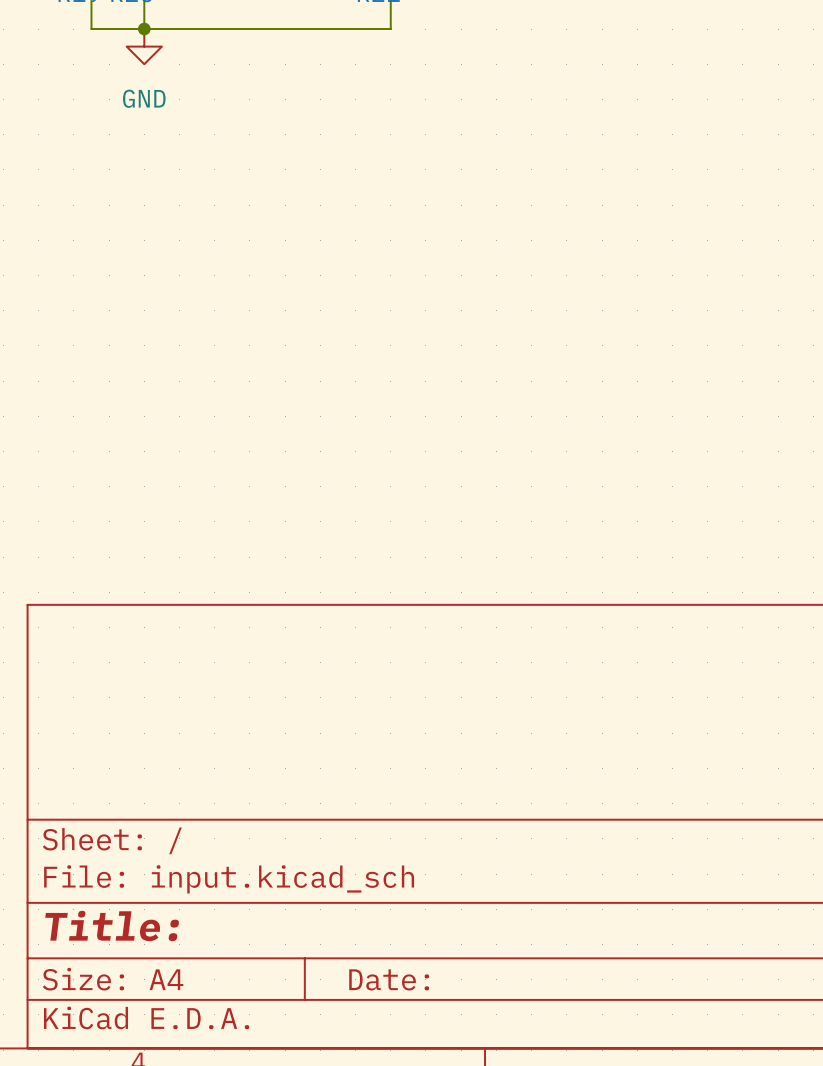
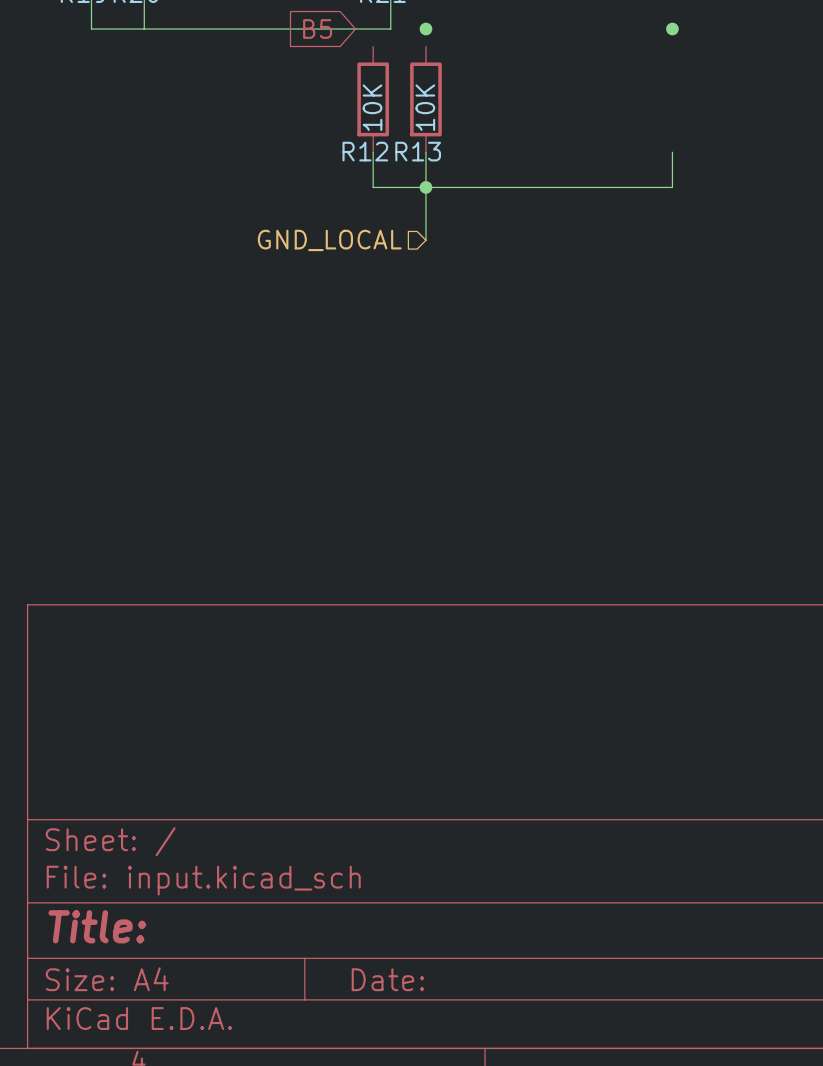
junction: (144, 29) -> none
global label: none -> B5 (317, 29)
junction: none -> (425, 29)
junction: none -> (672, 29)
power symbol: GND (144, 46) -> none
R12: none -> 10K (373, 99)
R13: none -> 10K (425, 99)
wire: none -> (373, 152) (373, 187) (672, 187) (672, 152)
wire: none -> (425, 152) (425, 240)
junction: none -> (425, 187)
hierarchical label: none -> GND_LOCAL (329, 240)

